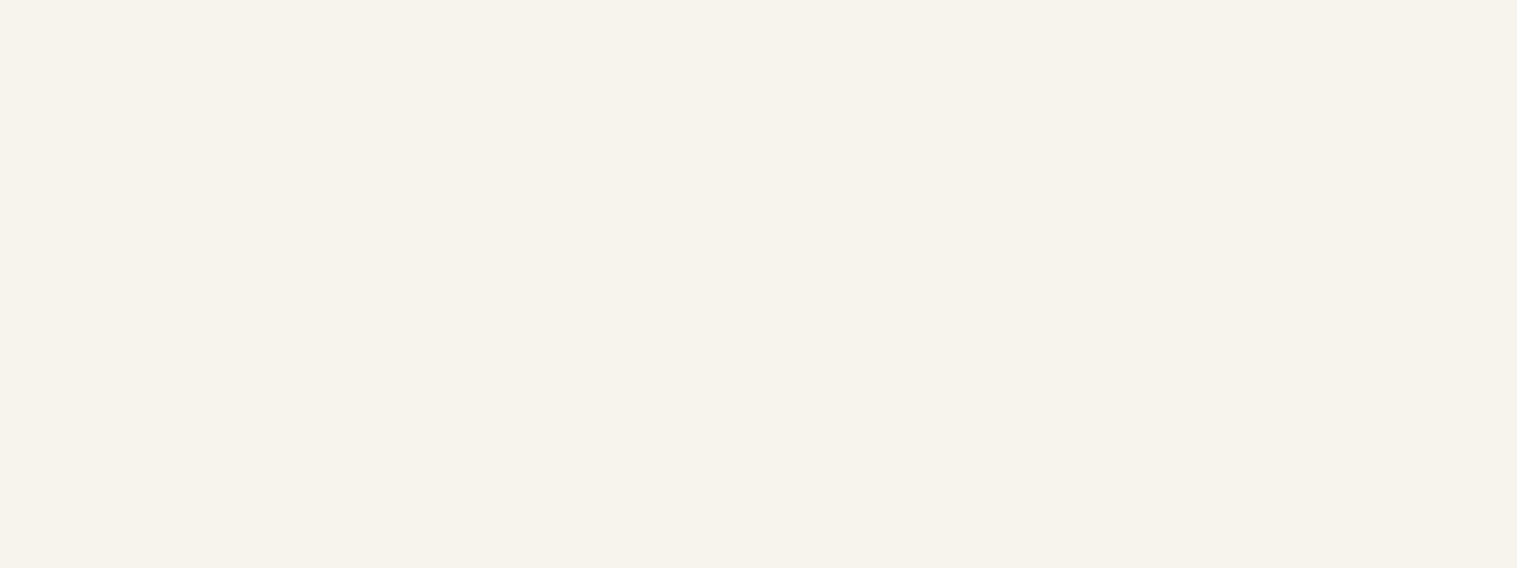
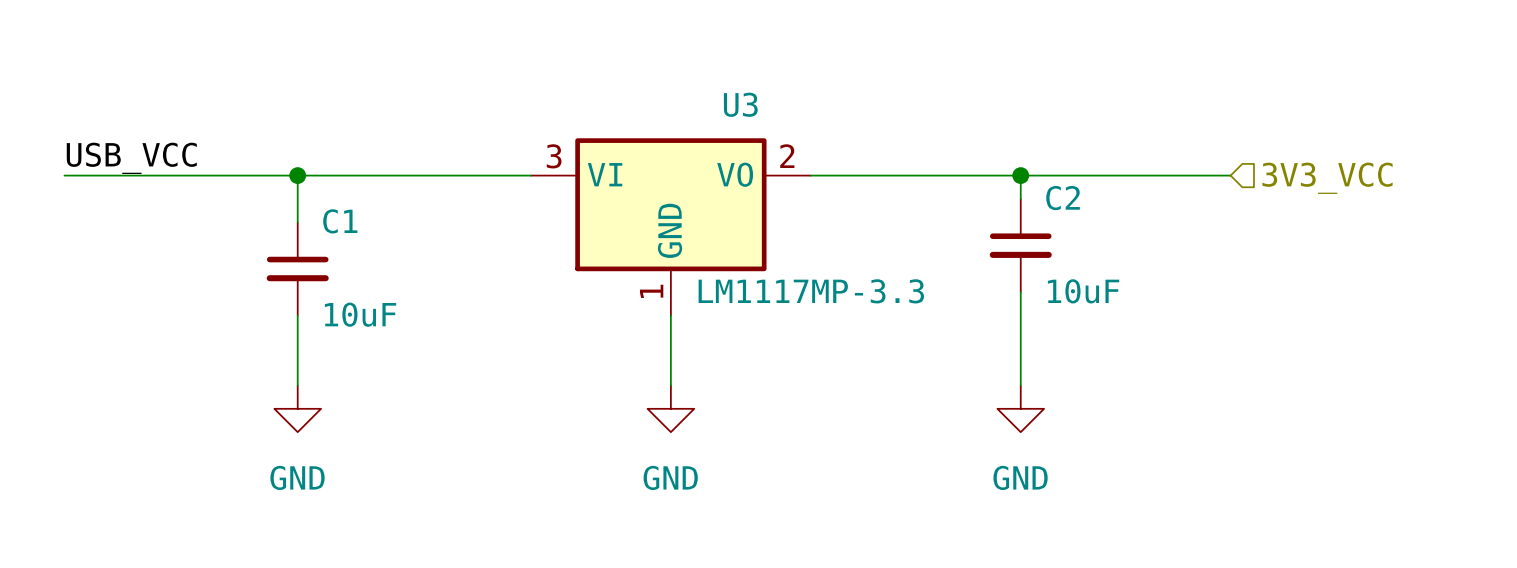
label: none -> USB_VCC (131, 158)
wire: none -> (64, 175) (530, 175)
wire: none -> (297, 175) (297, 222)
junction: none -> (297, 175)
wire: none -> (810, 175) (1230, 175)
wire: none -> (1020, 175) (1020, 198)
junction: none -> (1020, 175)
hierarchical label: none -> 3V3_VCC (1327, 178)
U3: none -> LM1117MP-3.3 (670, 226)
C2: none -> 10uF (1020, 245)
C1: none -> 10uF (297, 268)
wire: none -> (1020, 292) (1020, 385)
wire: none -> (297, 315) (297, 385)
wire: none -> (670, 315) (670, 385)
power symbol: none -> GND (297, 408)
power symbol: none -> GND (670, 408)
power symbol: none -> GND (1020, 408)

